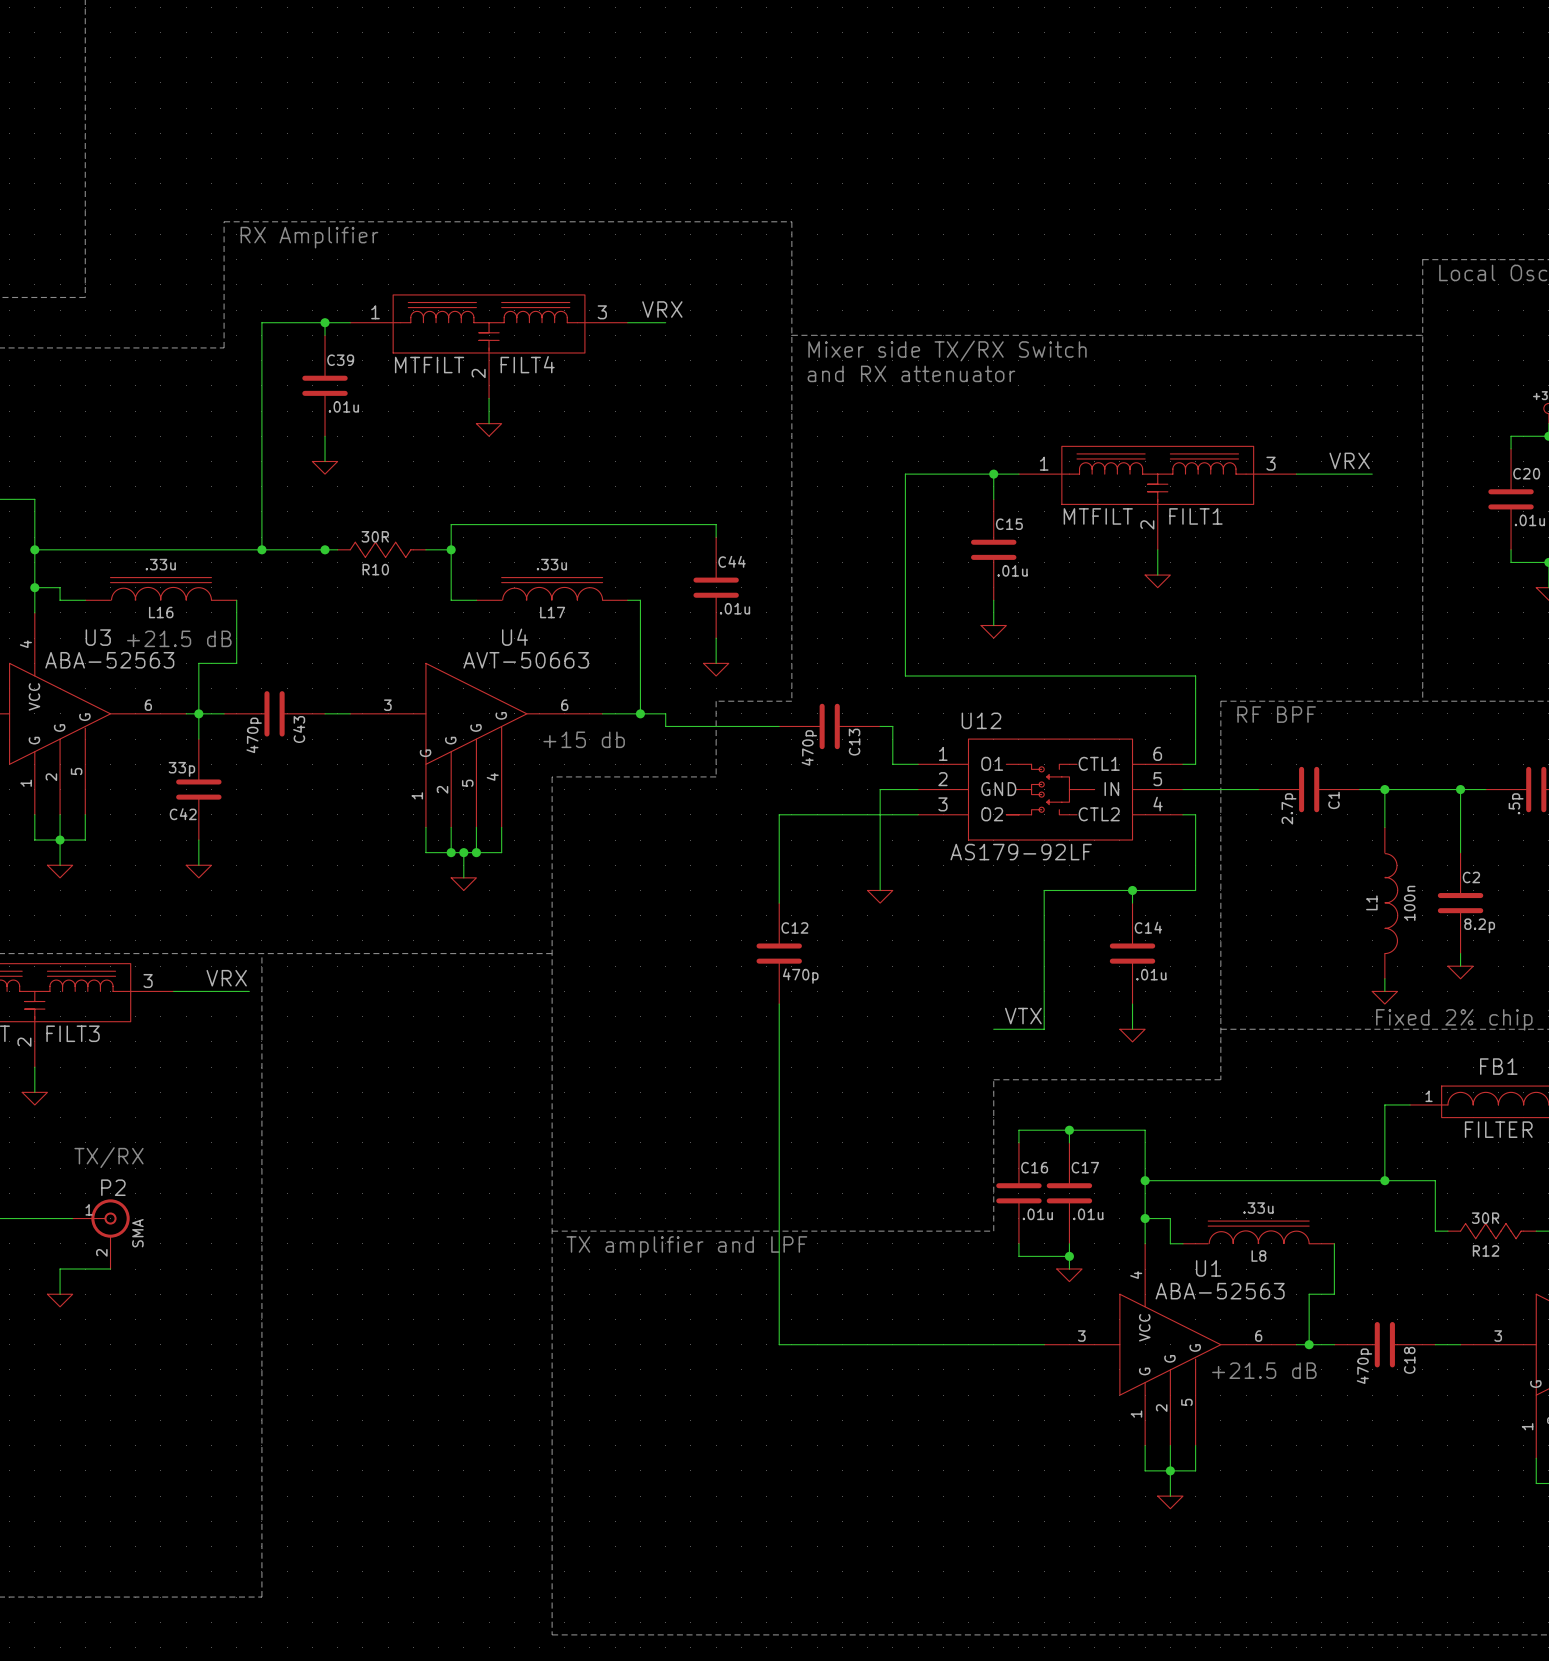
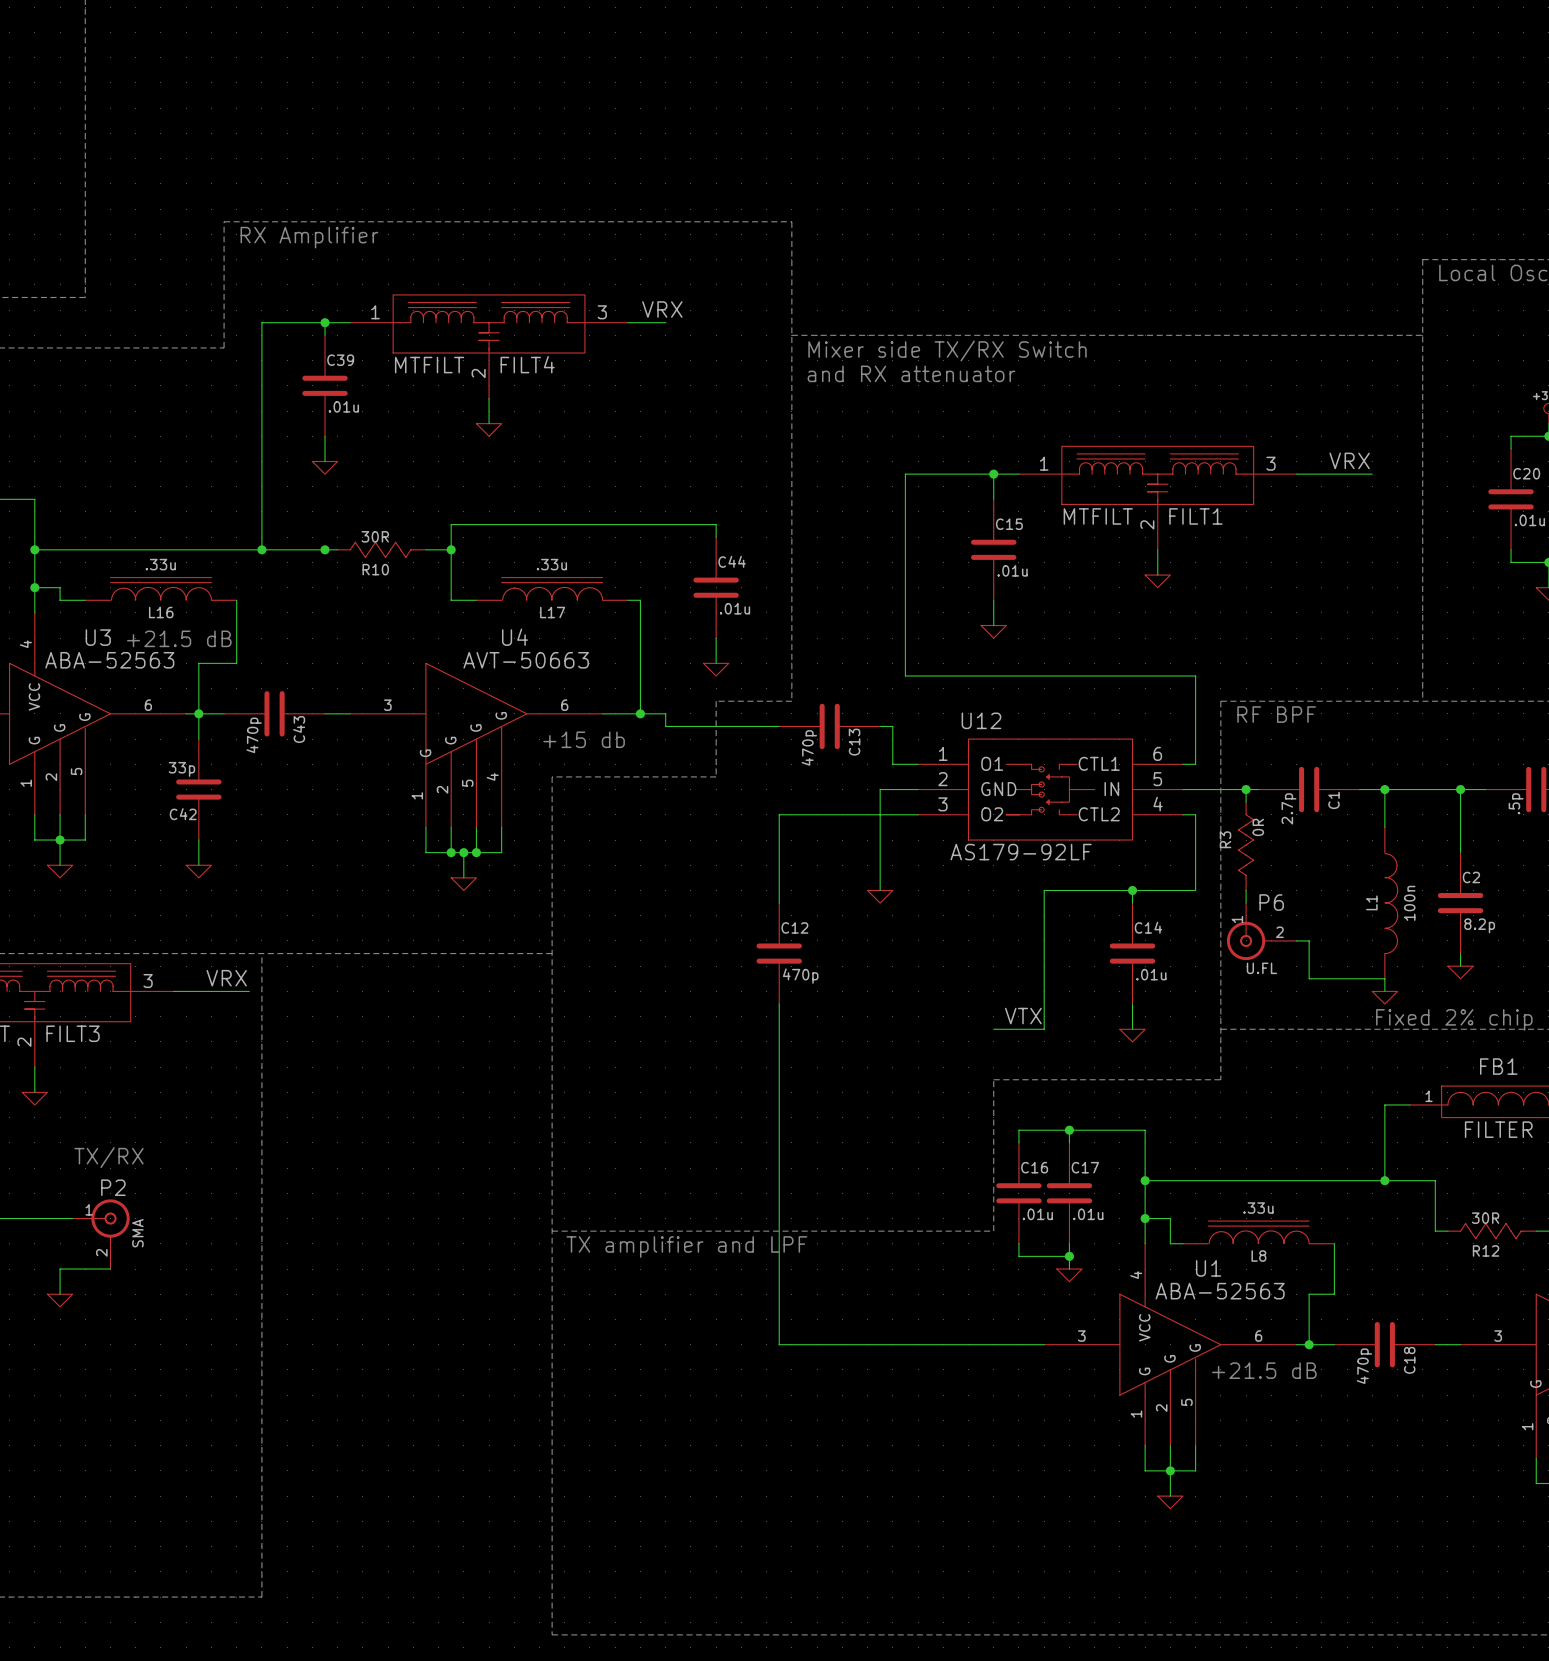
wire: none -> (1246, 789) (1246, 802)
junction: none -> (1246, 789)
R3: none -> 0R (1246, 846)
wire: none -> (1246, 890) (1246, 903)
P6: none -> U.FL (1261, 931)
wire: none -> (1296, 940) (1309, 940) (1309, 978) (1384, 978)

